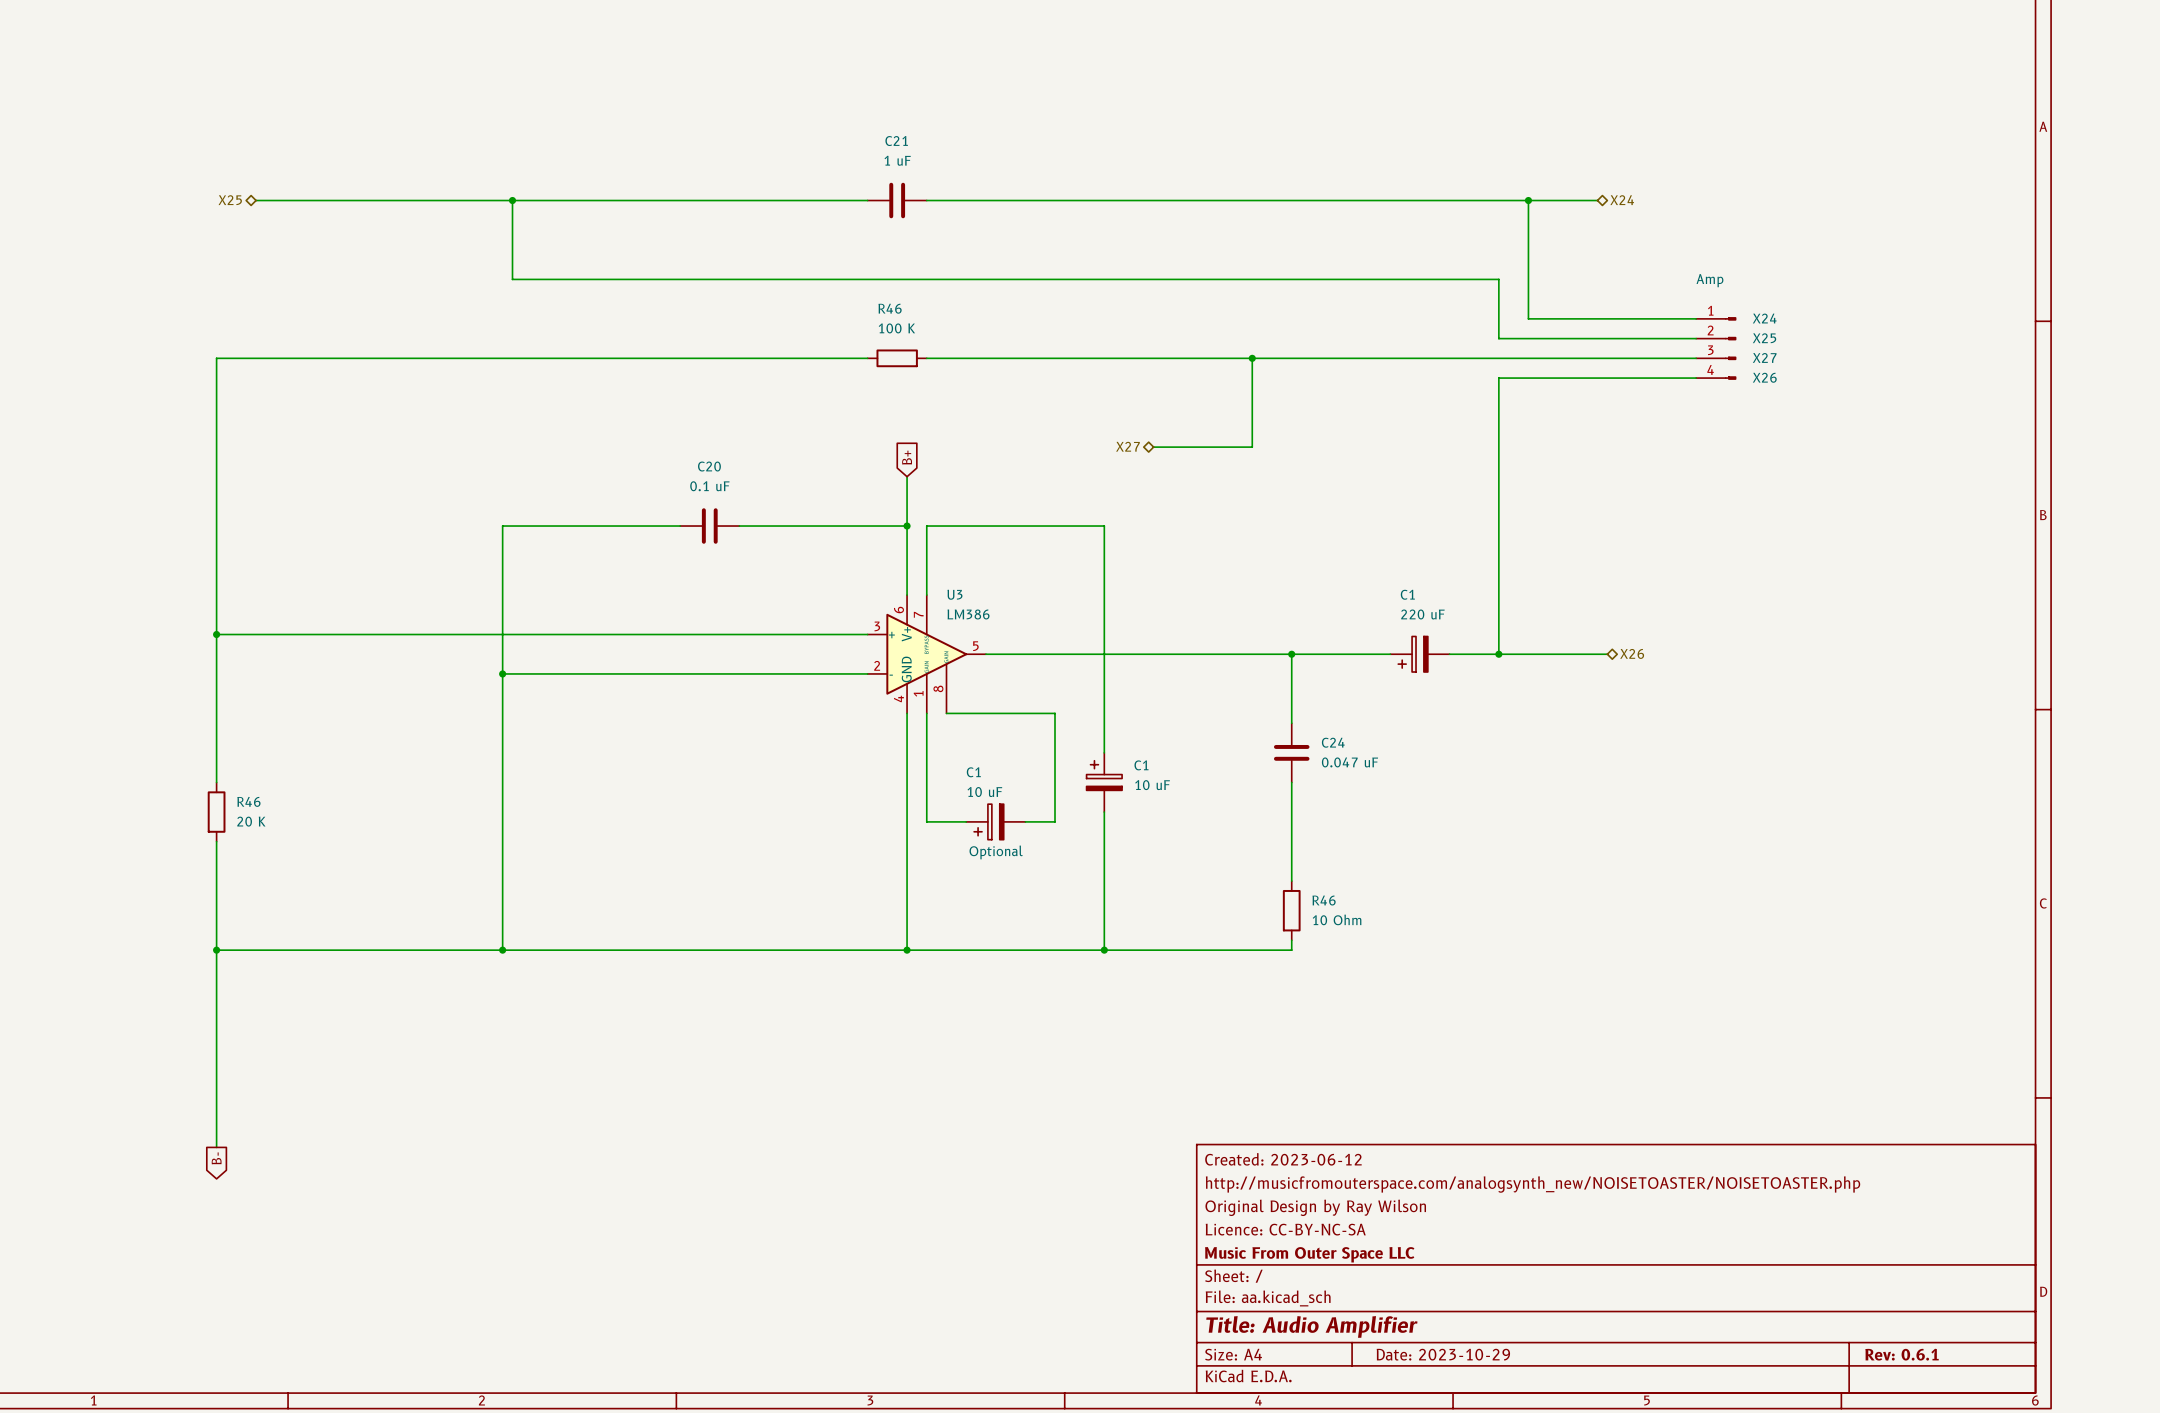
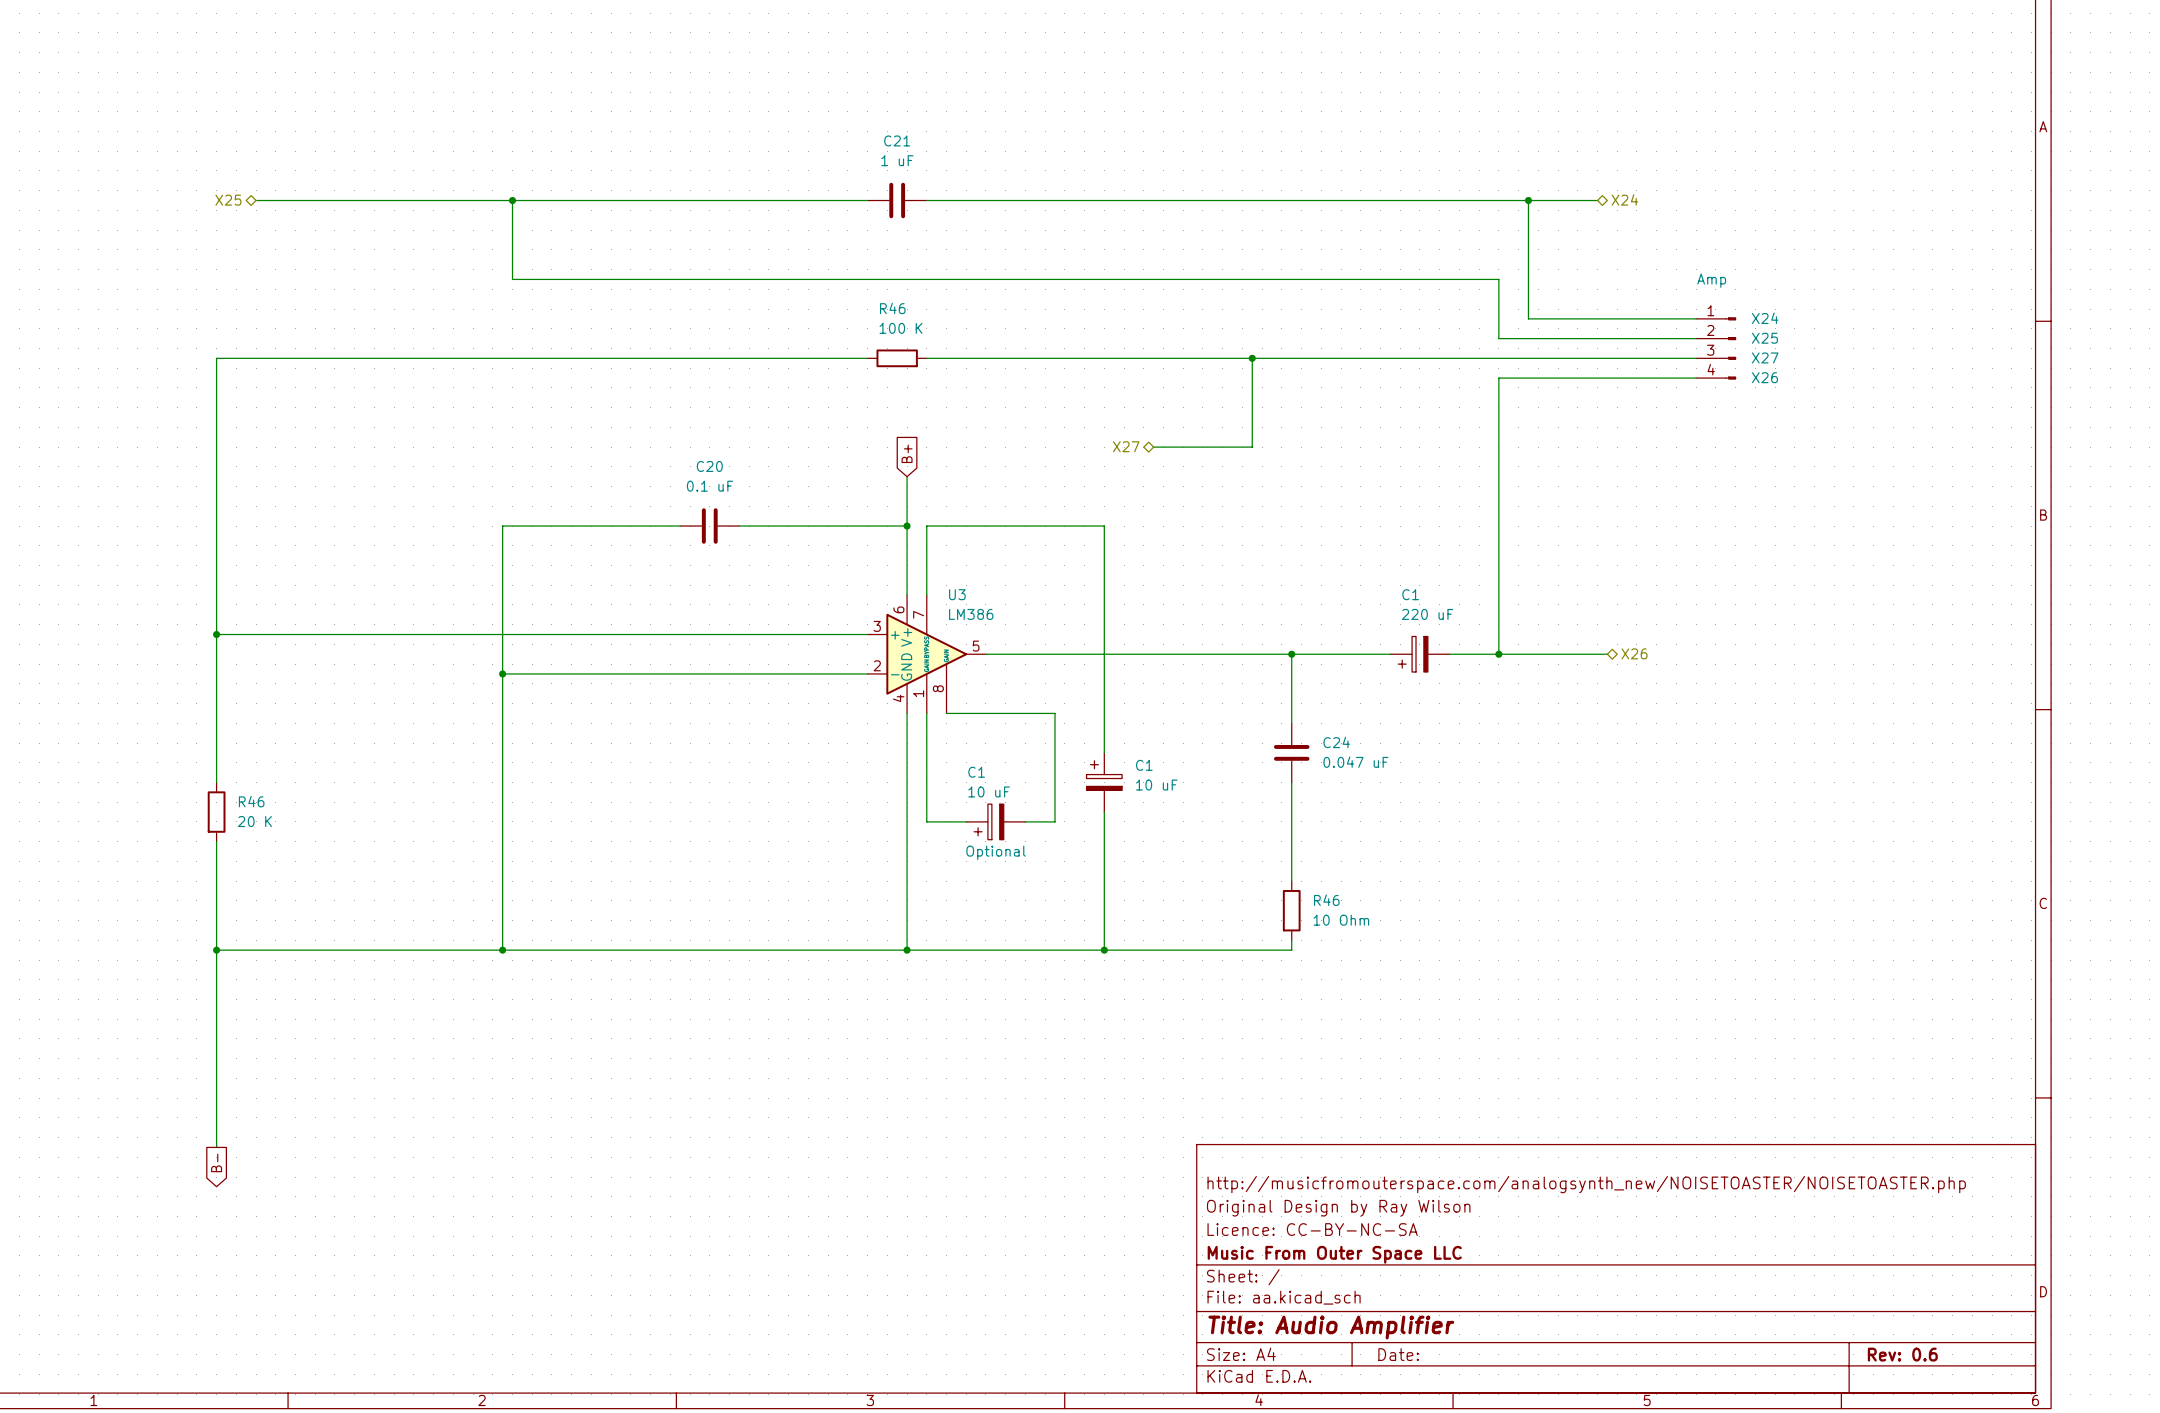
title block: Created: 2023-06-12 (1283, 1159) -> none
title block: Date: 2023-10-29 (1443, 1354) -> Date: (1398, 1354)
title block: Rev: 0.6.1 (1902, 1354) -> Rev: 0.6 (1902, 1354)

